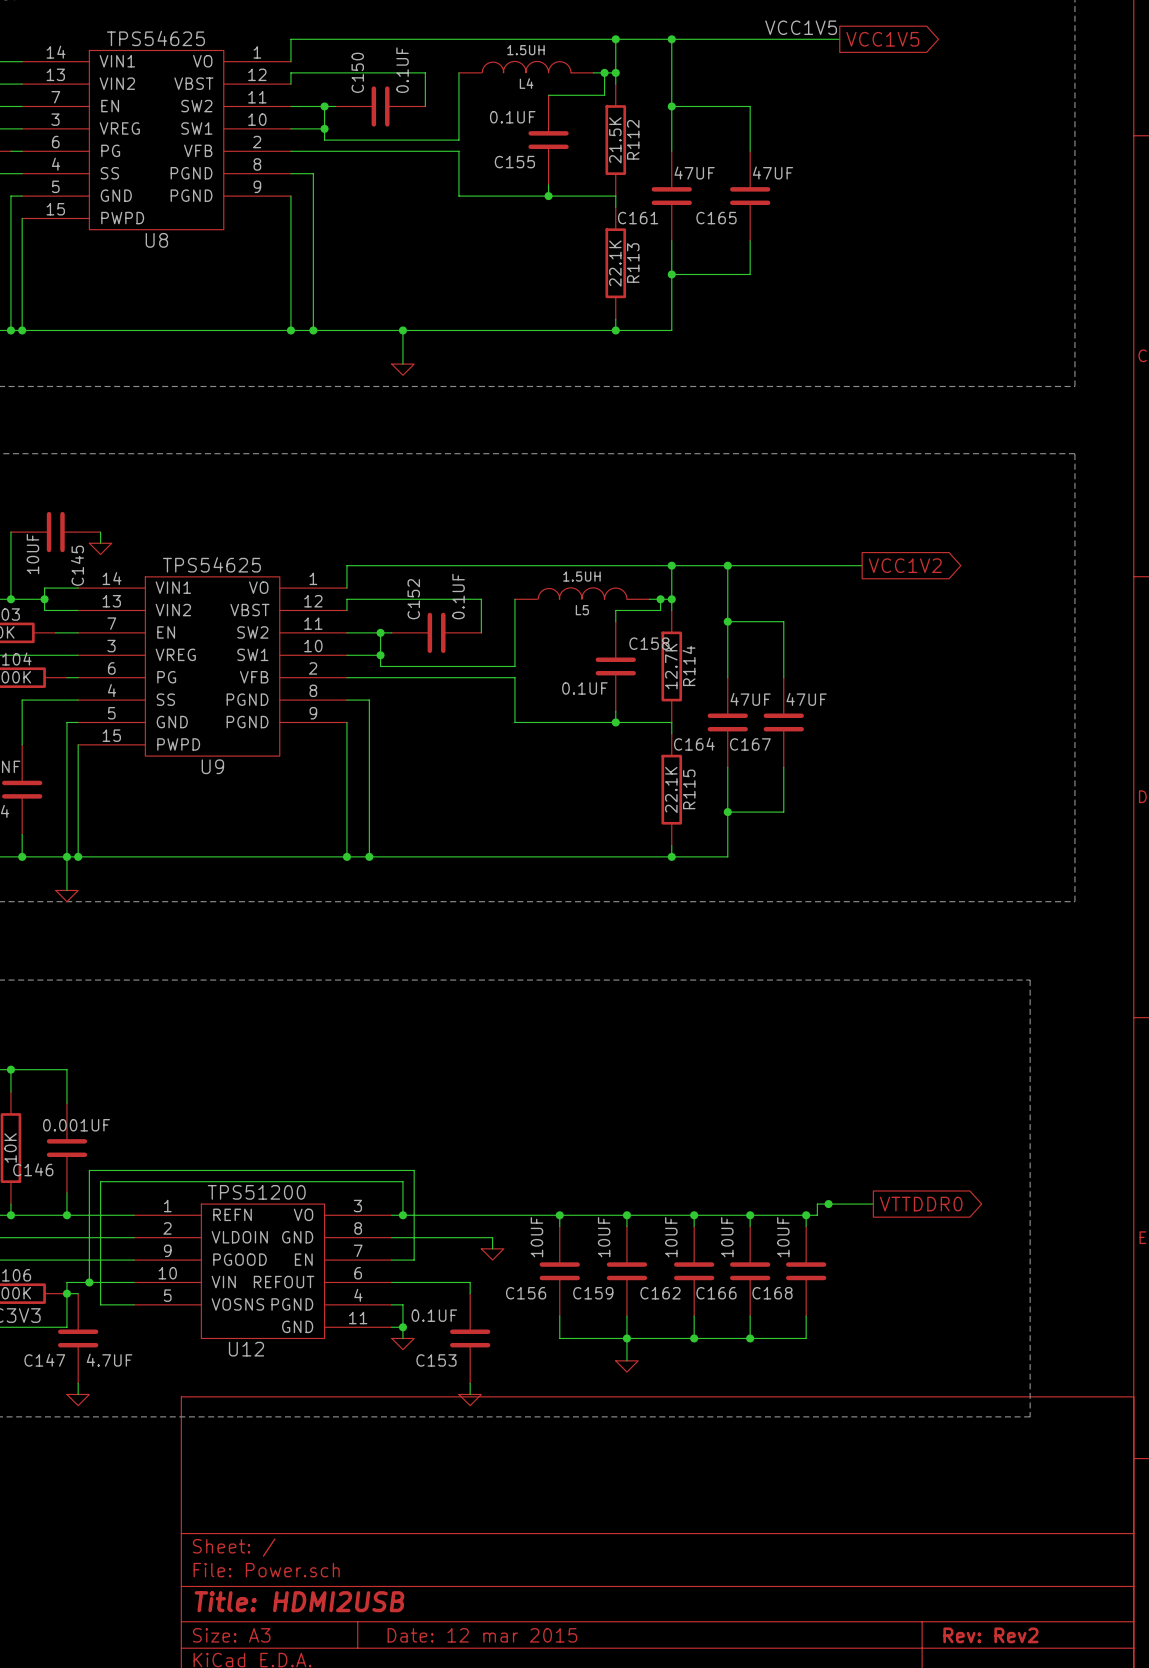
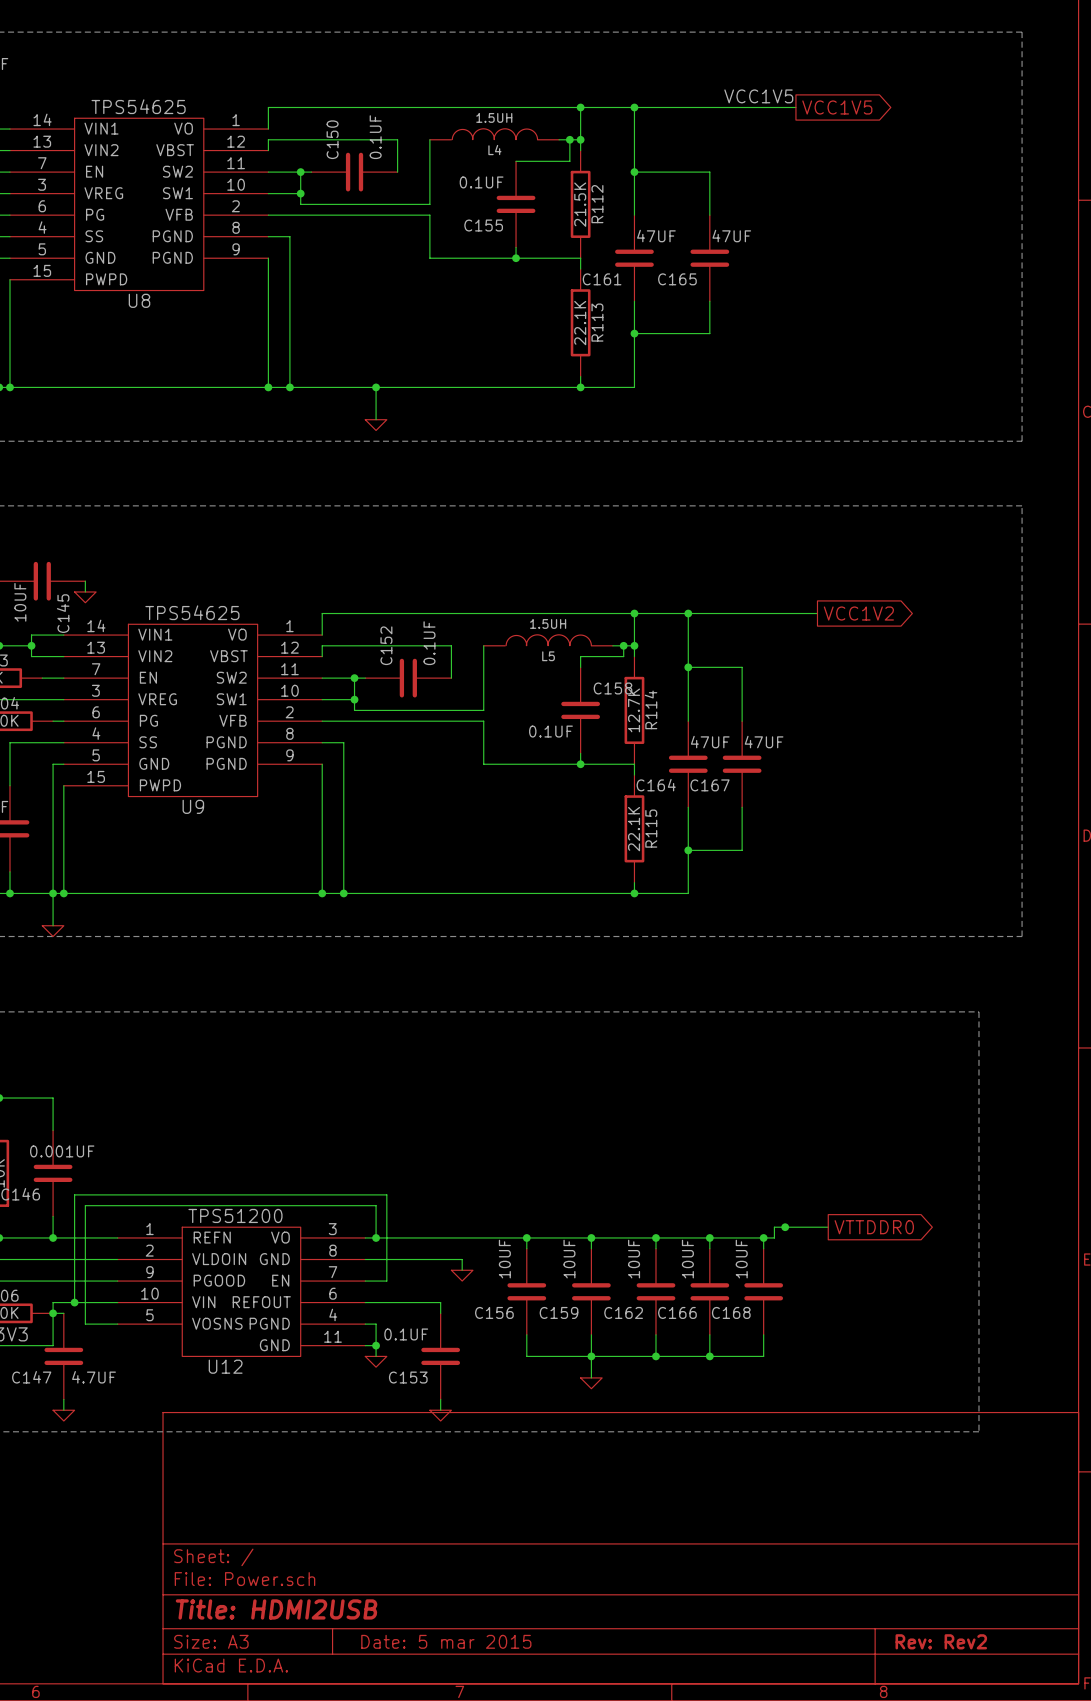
title block: Date: 12 mar 2015 (482, 1635) -> Date: 5 mar 2015 (446, 1641)

